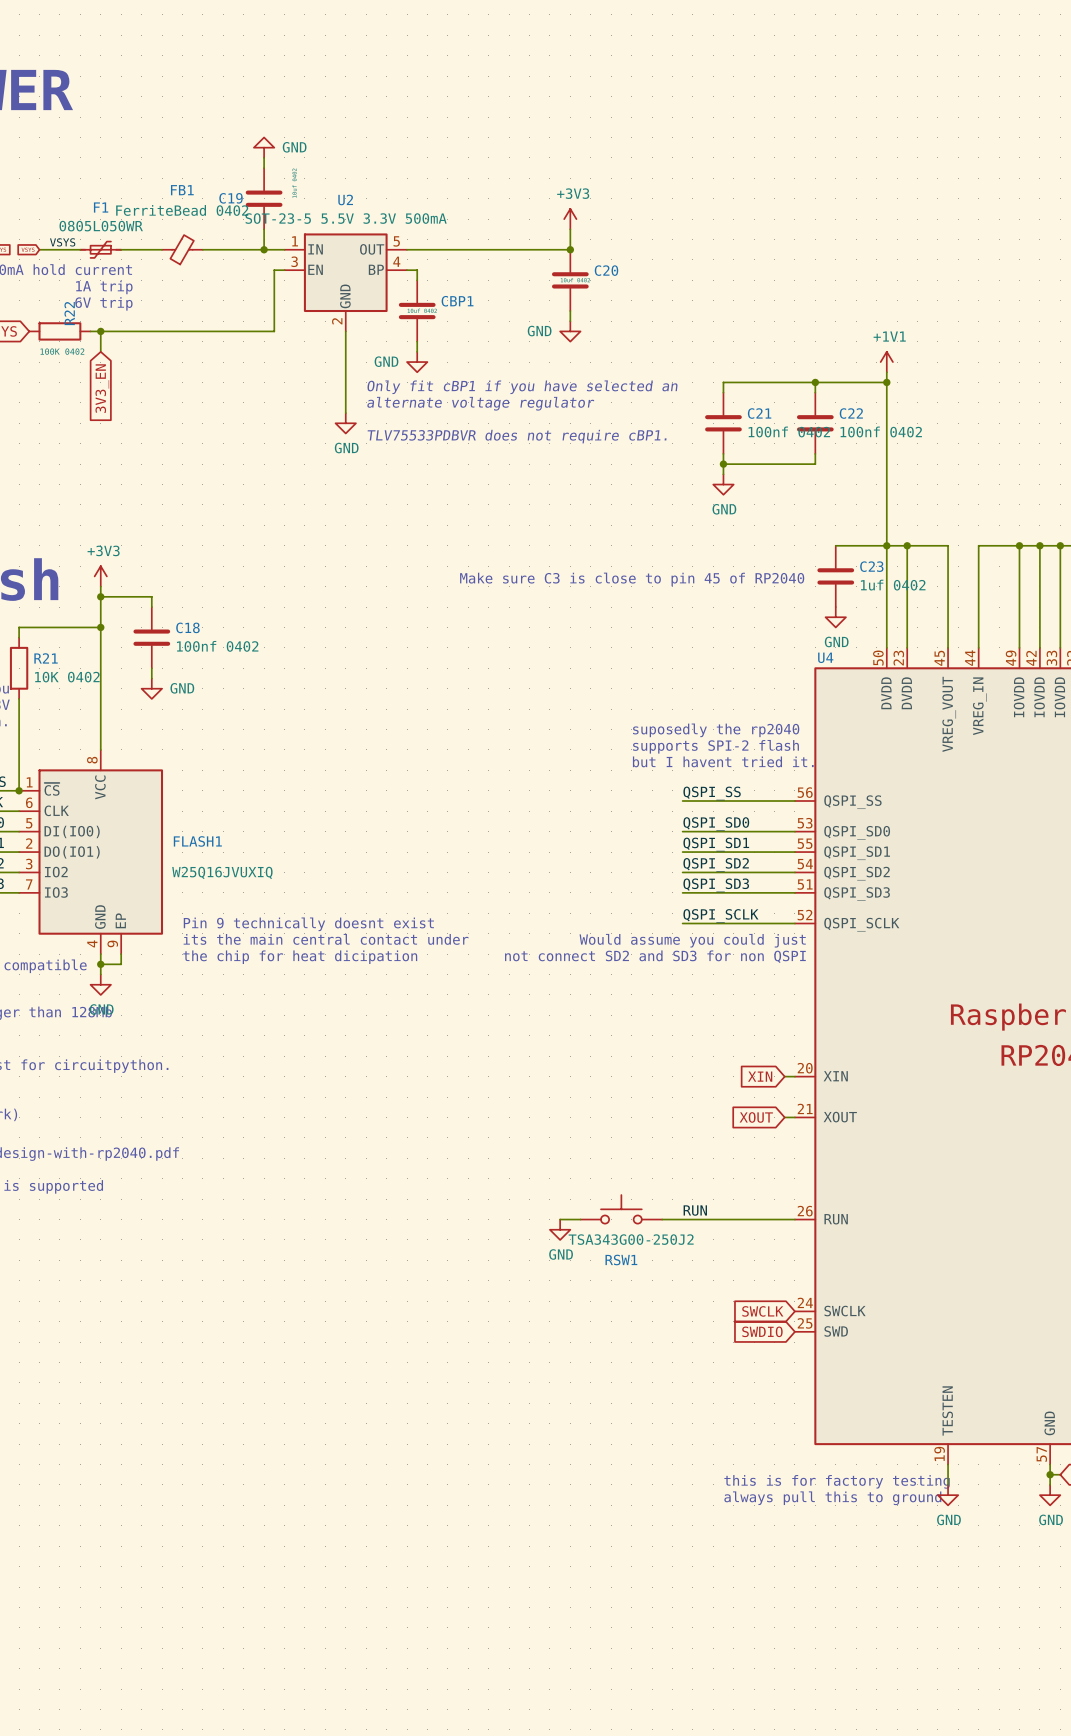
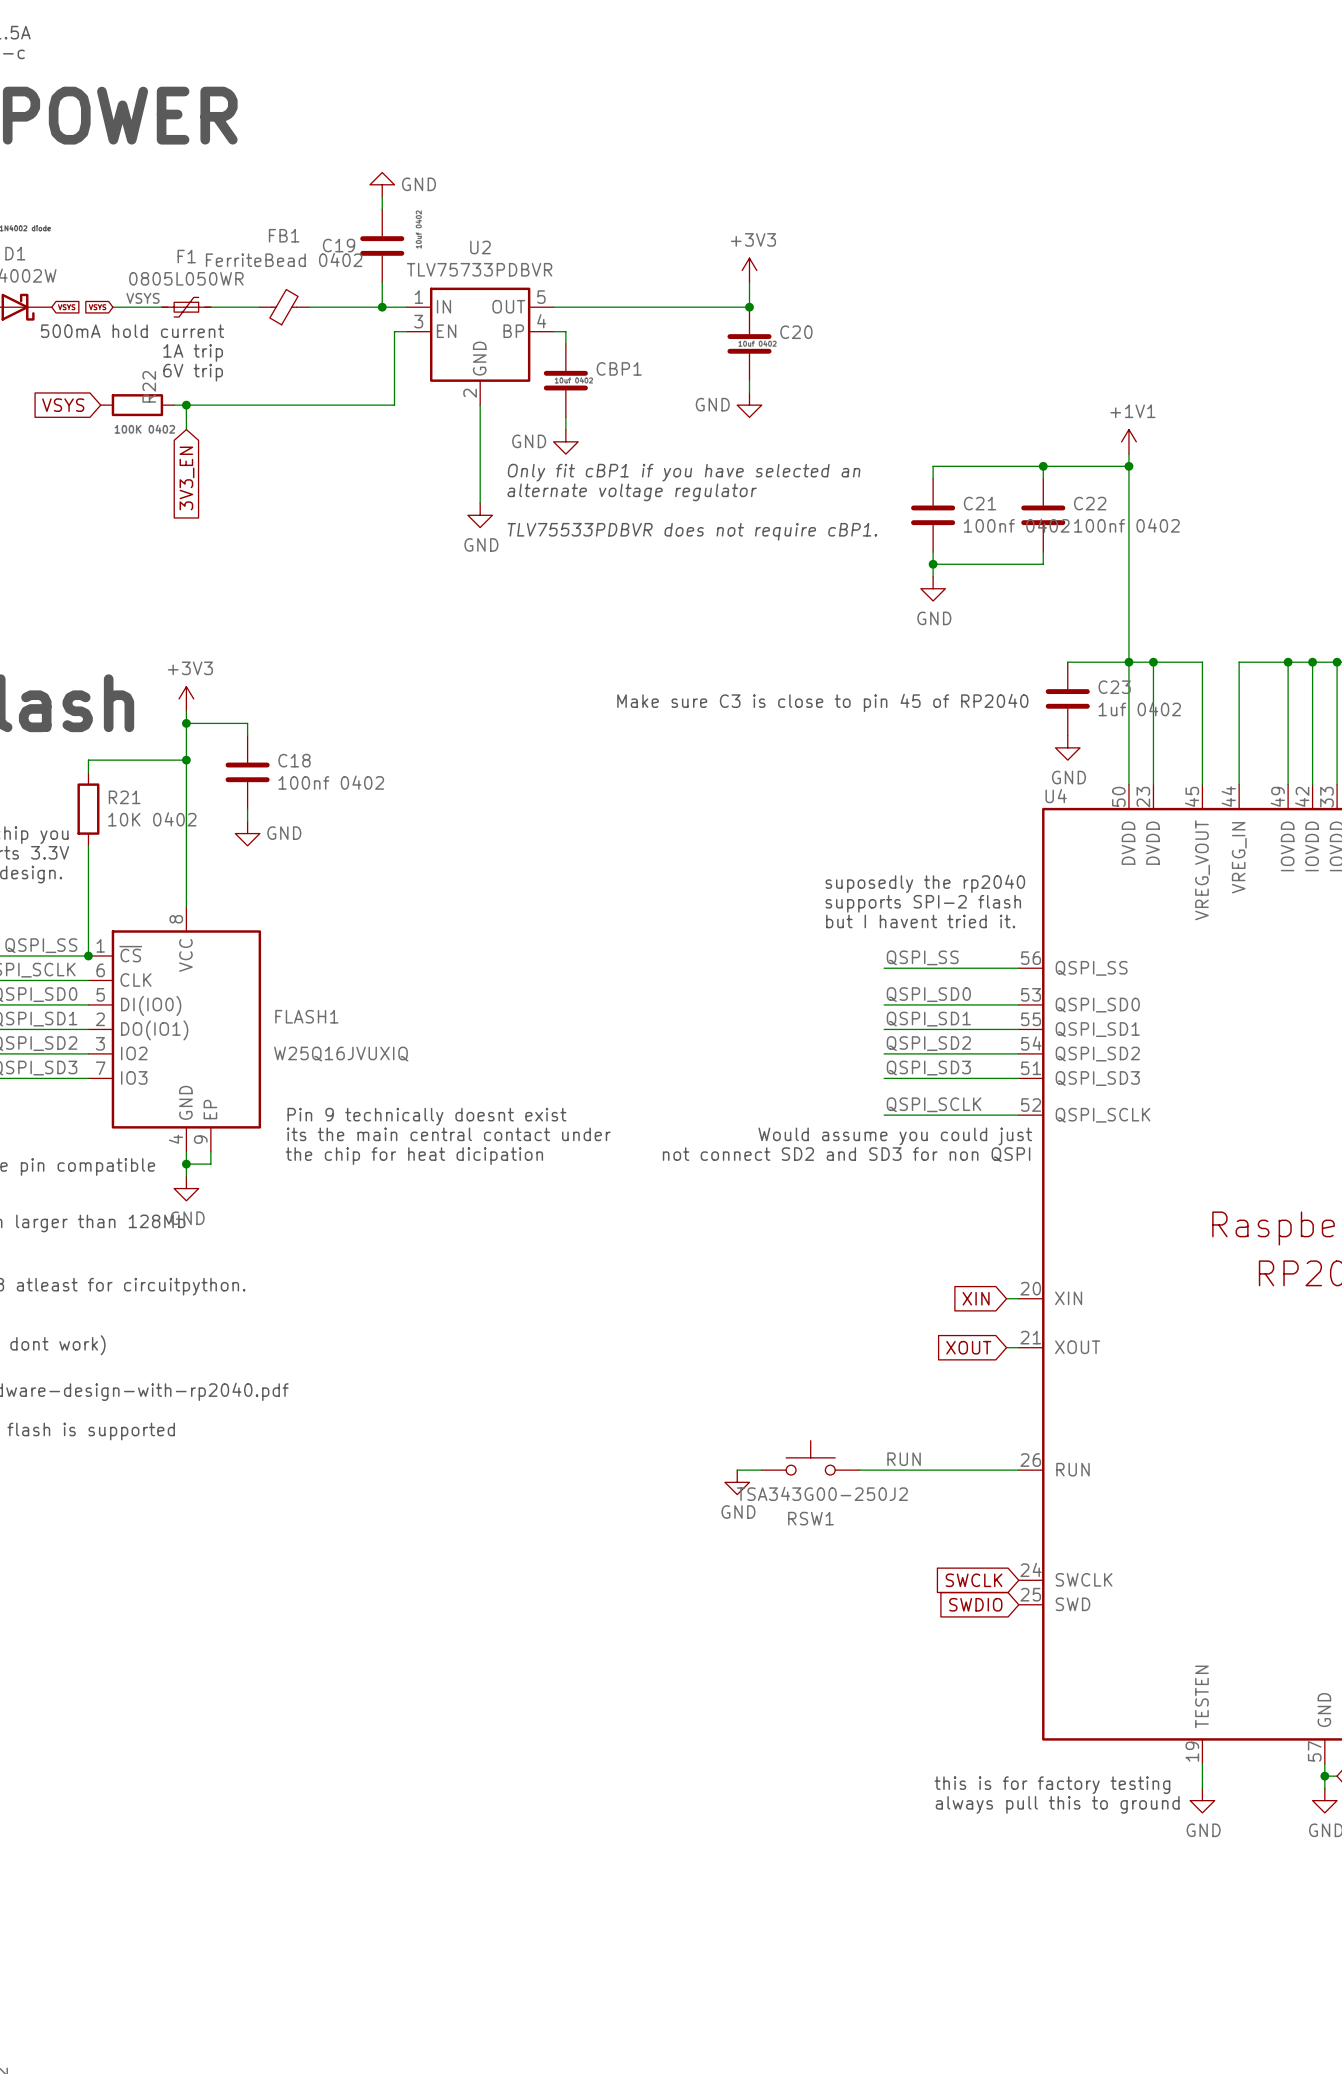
U2 value: SOT-23-5 5.5V 3.3V 500mA (346, 218) -> TLV75733PDBVR (479, 269)

